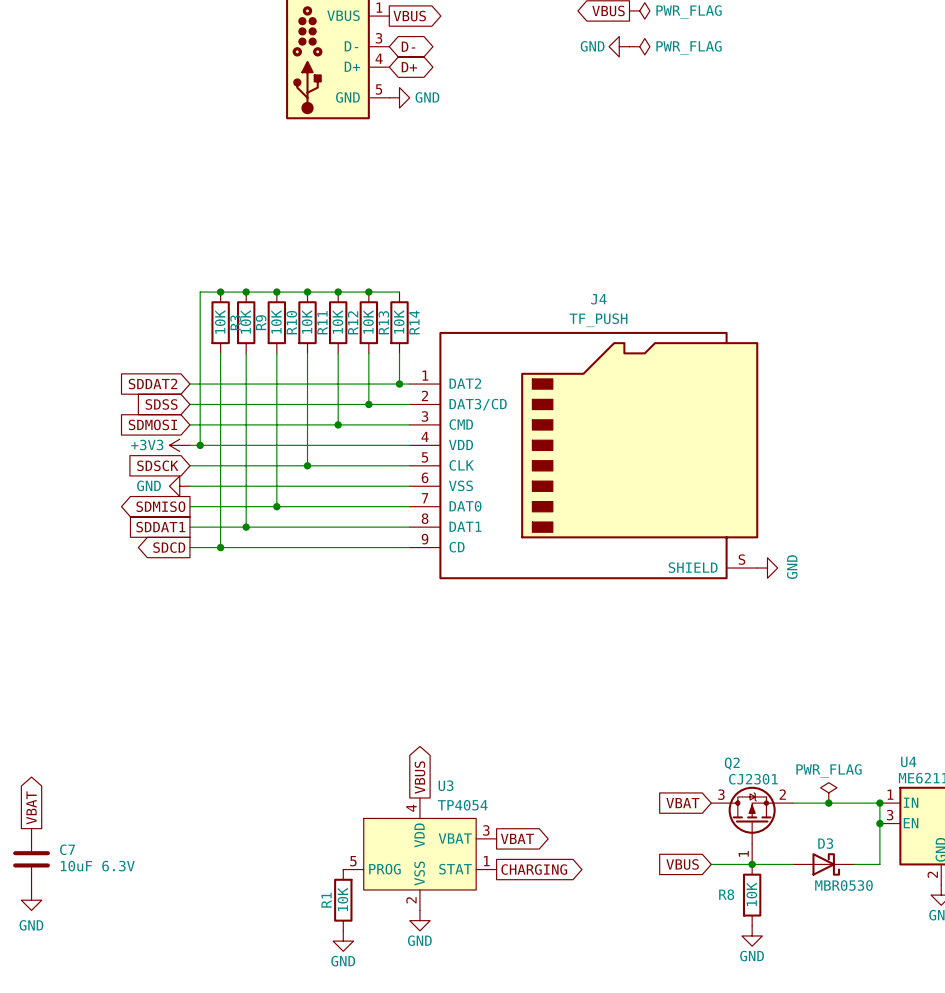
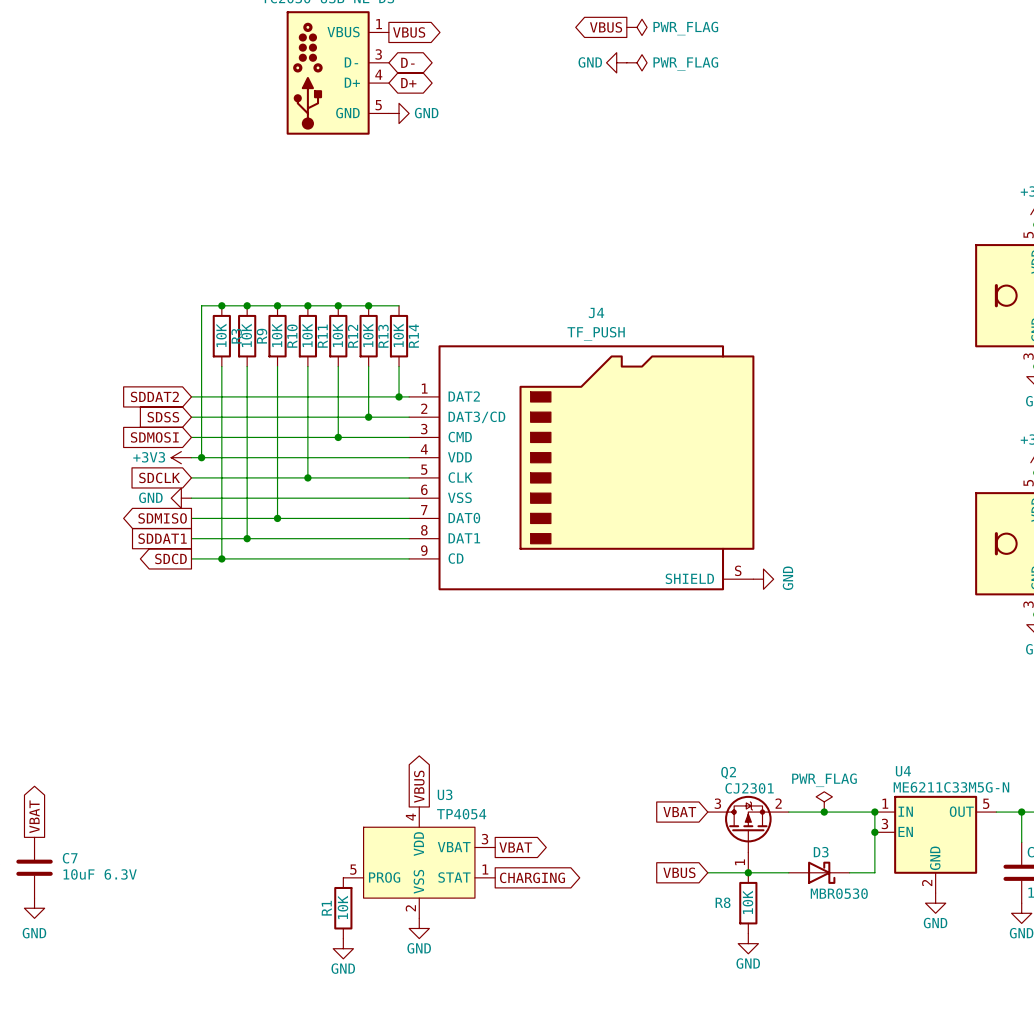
global label: SDSCK (157, 465) -> SDCLK (159, 477)

